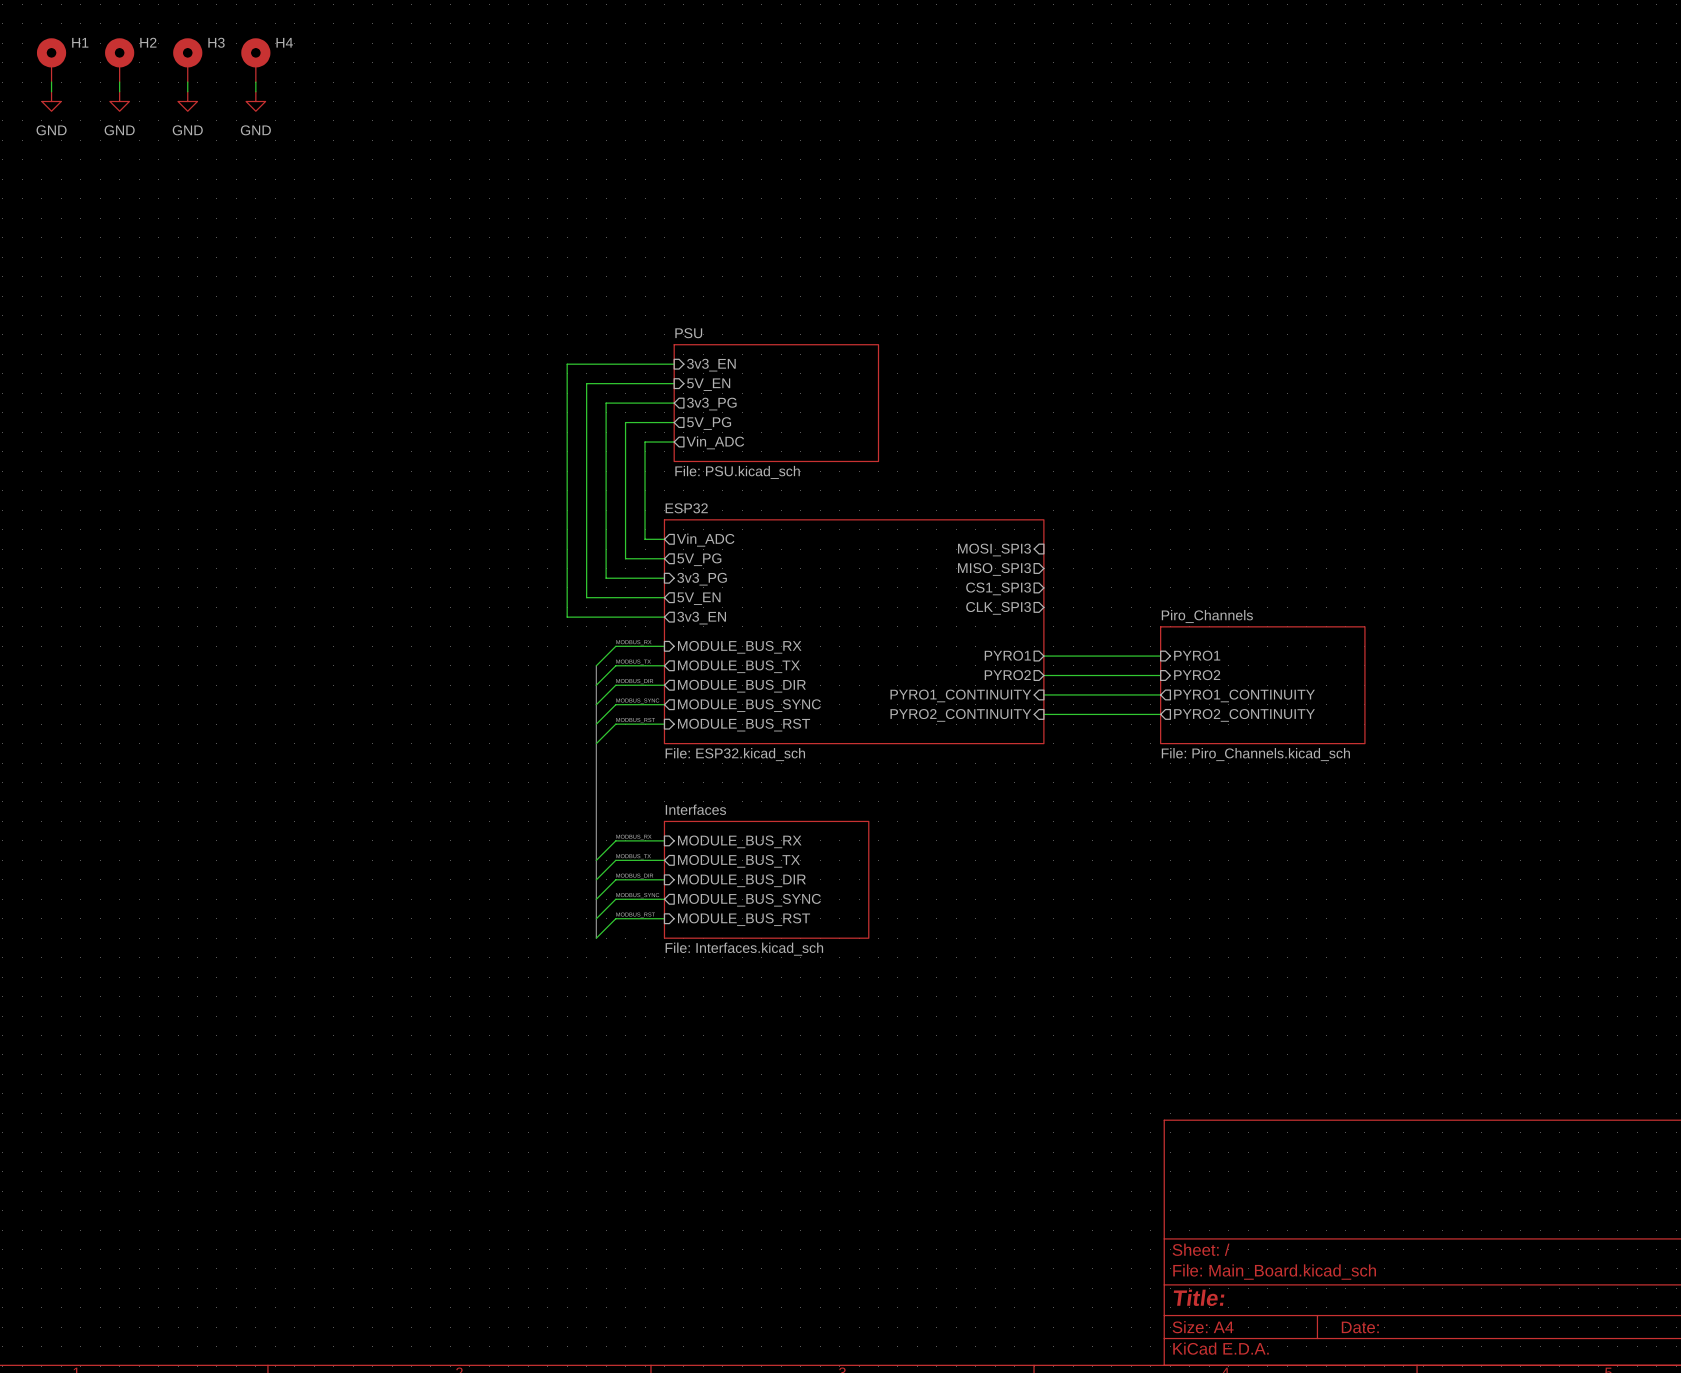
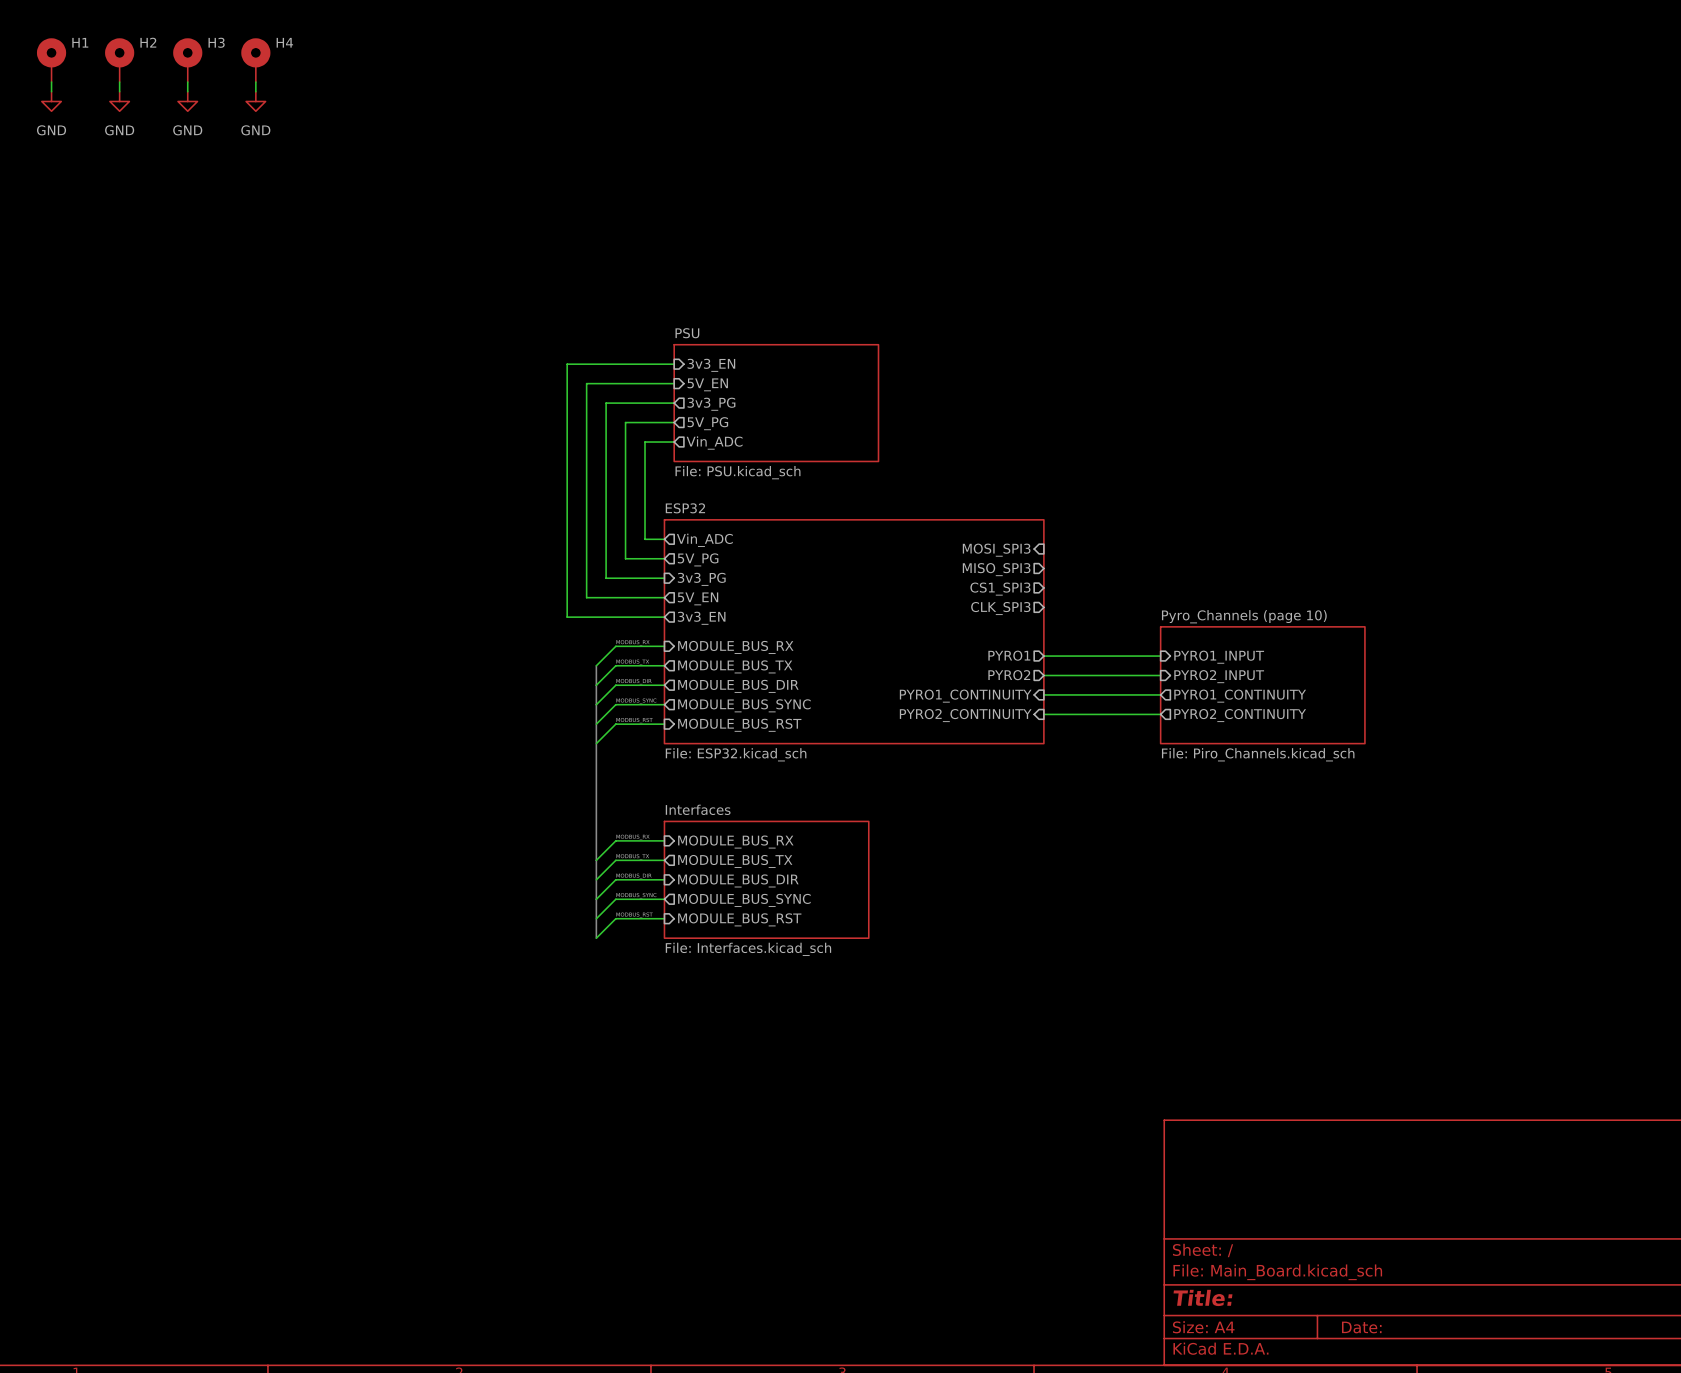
sheet Piro_Channels name: Piro_Channels (1207, 616) -> Pyro_Channels (page 10) (1244, 616)
sheet pin: PYRO1 (1197, 655) -> PYRO1_INPUT (1219, 657)
sheet pin: PYRO2 (1197, 675) -> PYRO2_INPUT (1219, 676)

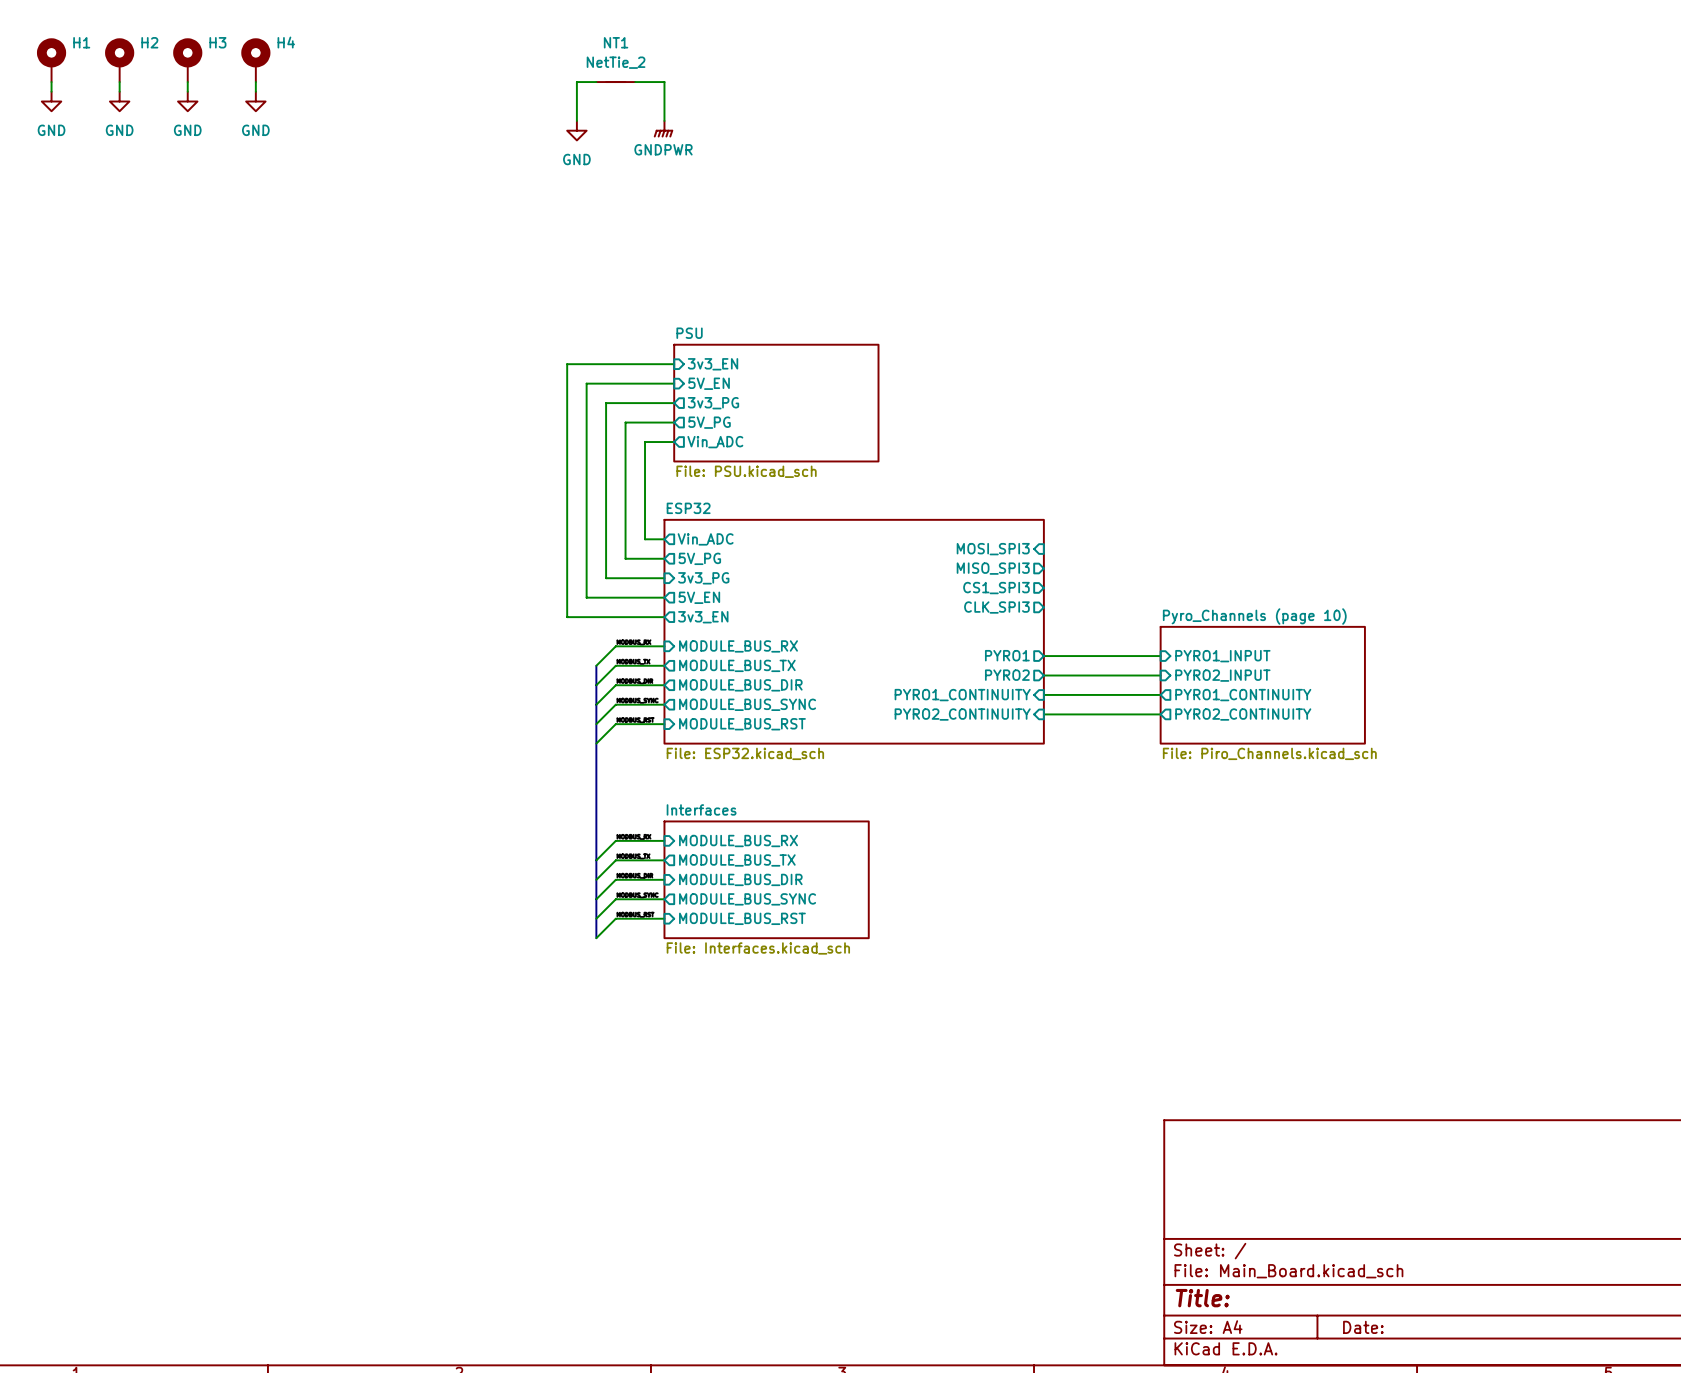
wire: none -> (596, 82) (576, 82) (576, 120)
NT1: none -> NetTie_2 (615, 82)
wire: none -> (635, 82) (664, 82) (664, 120)
power symbol: none -> GNDPWR (663, 129)
power symbol: none -> GND (576, 130)

